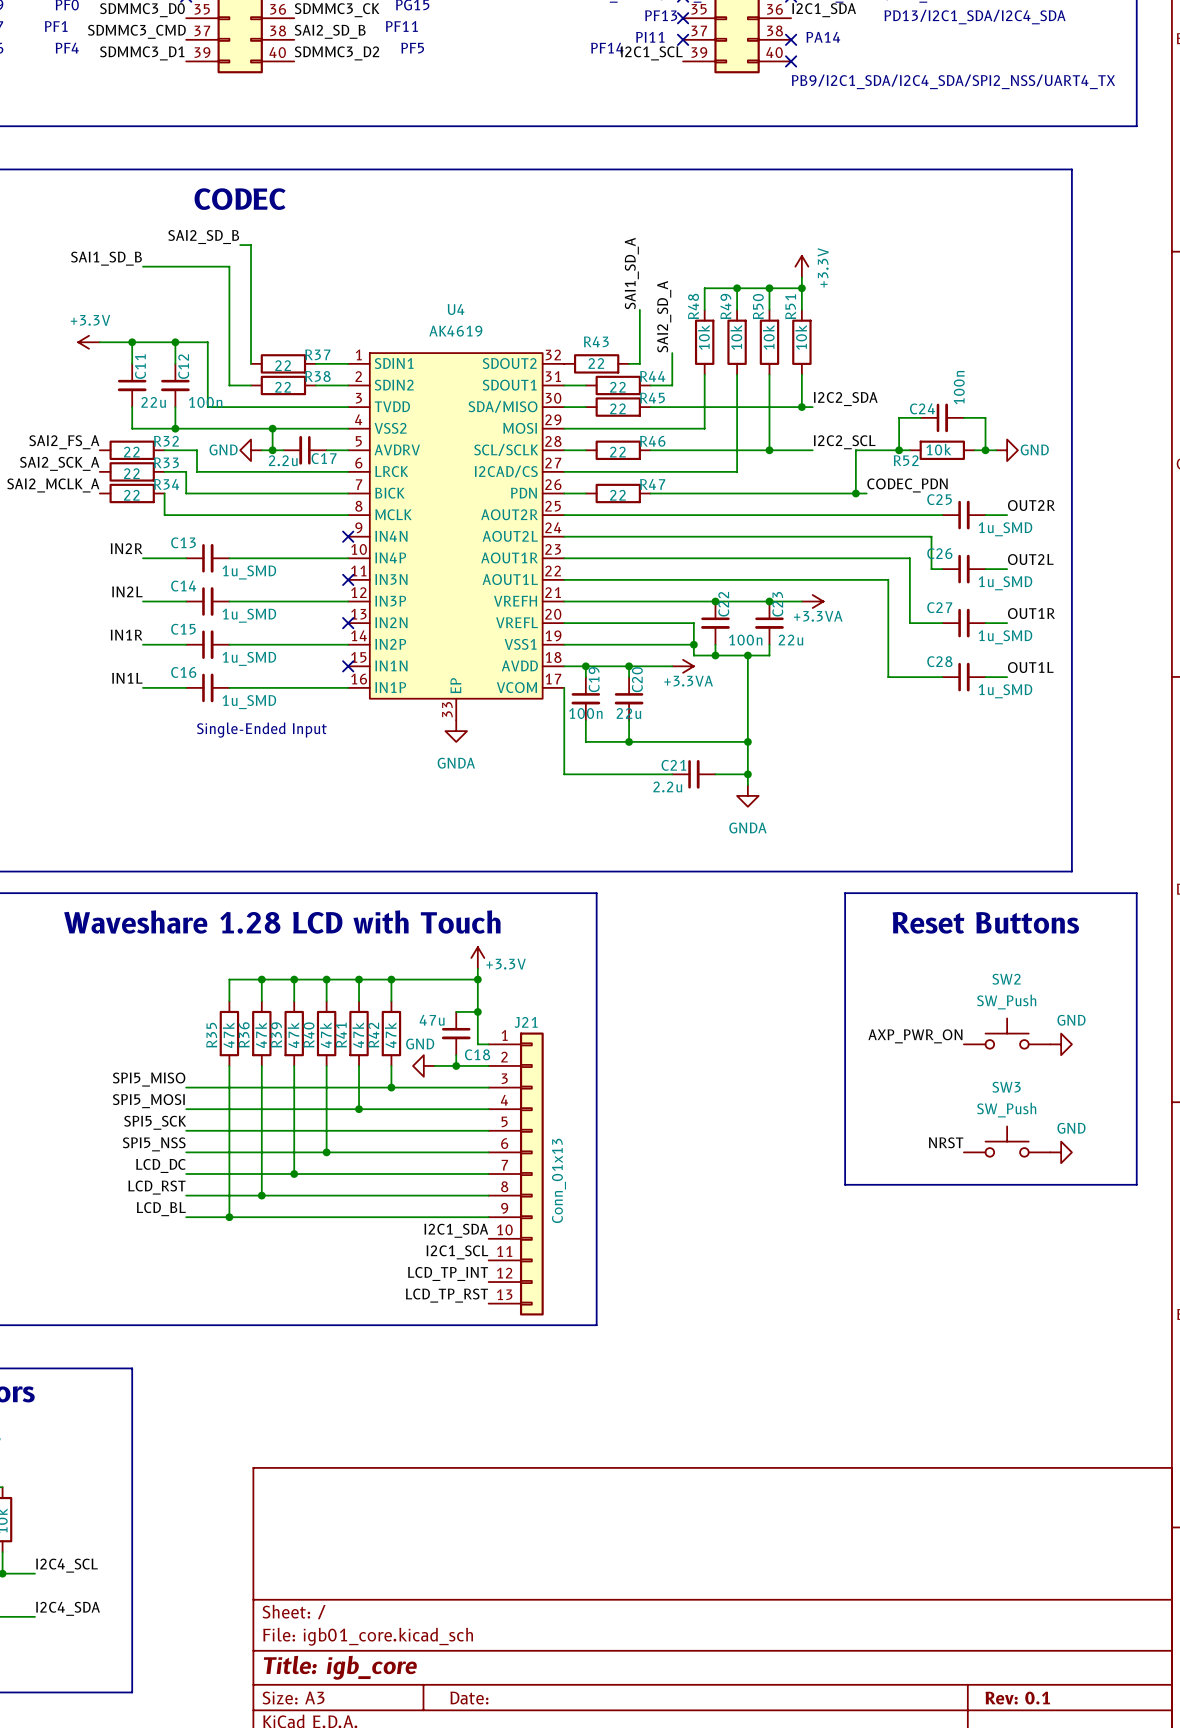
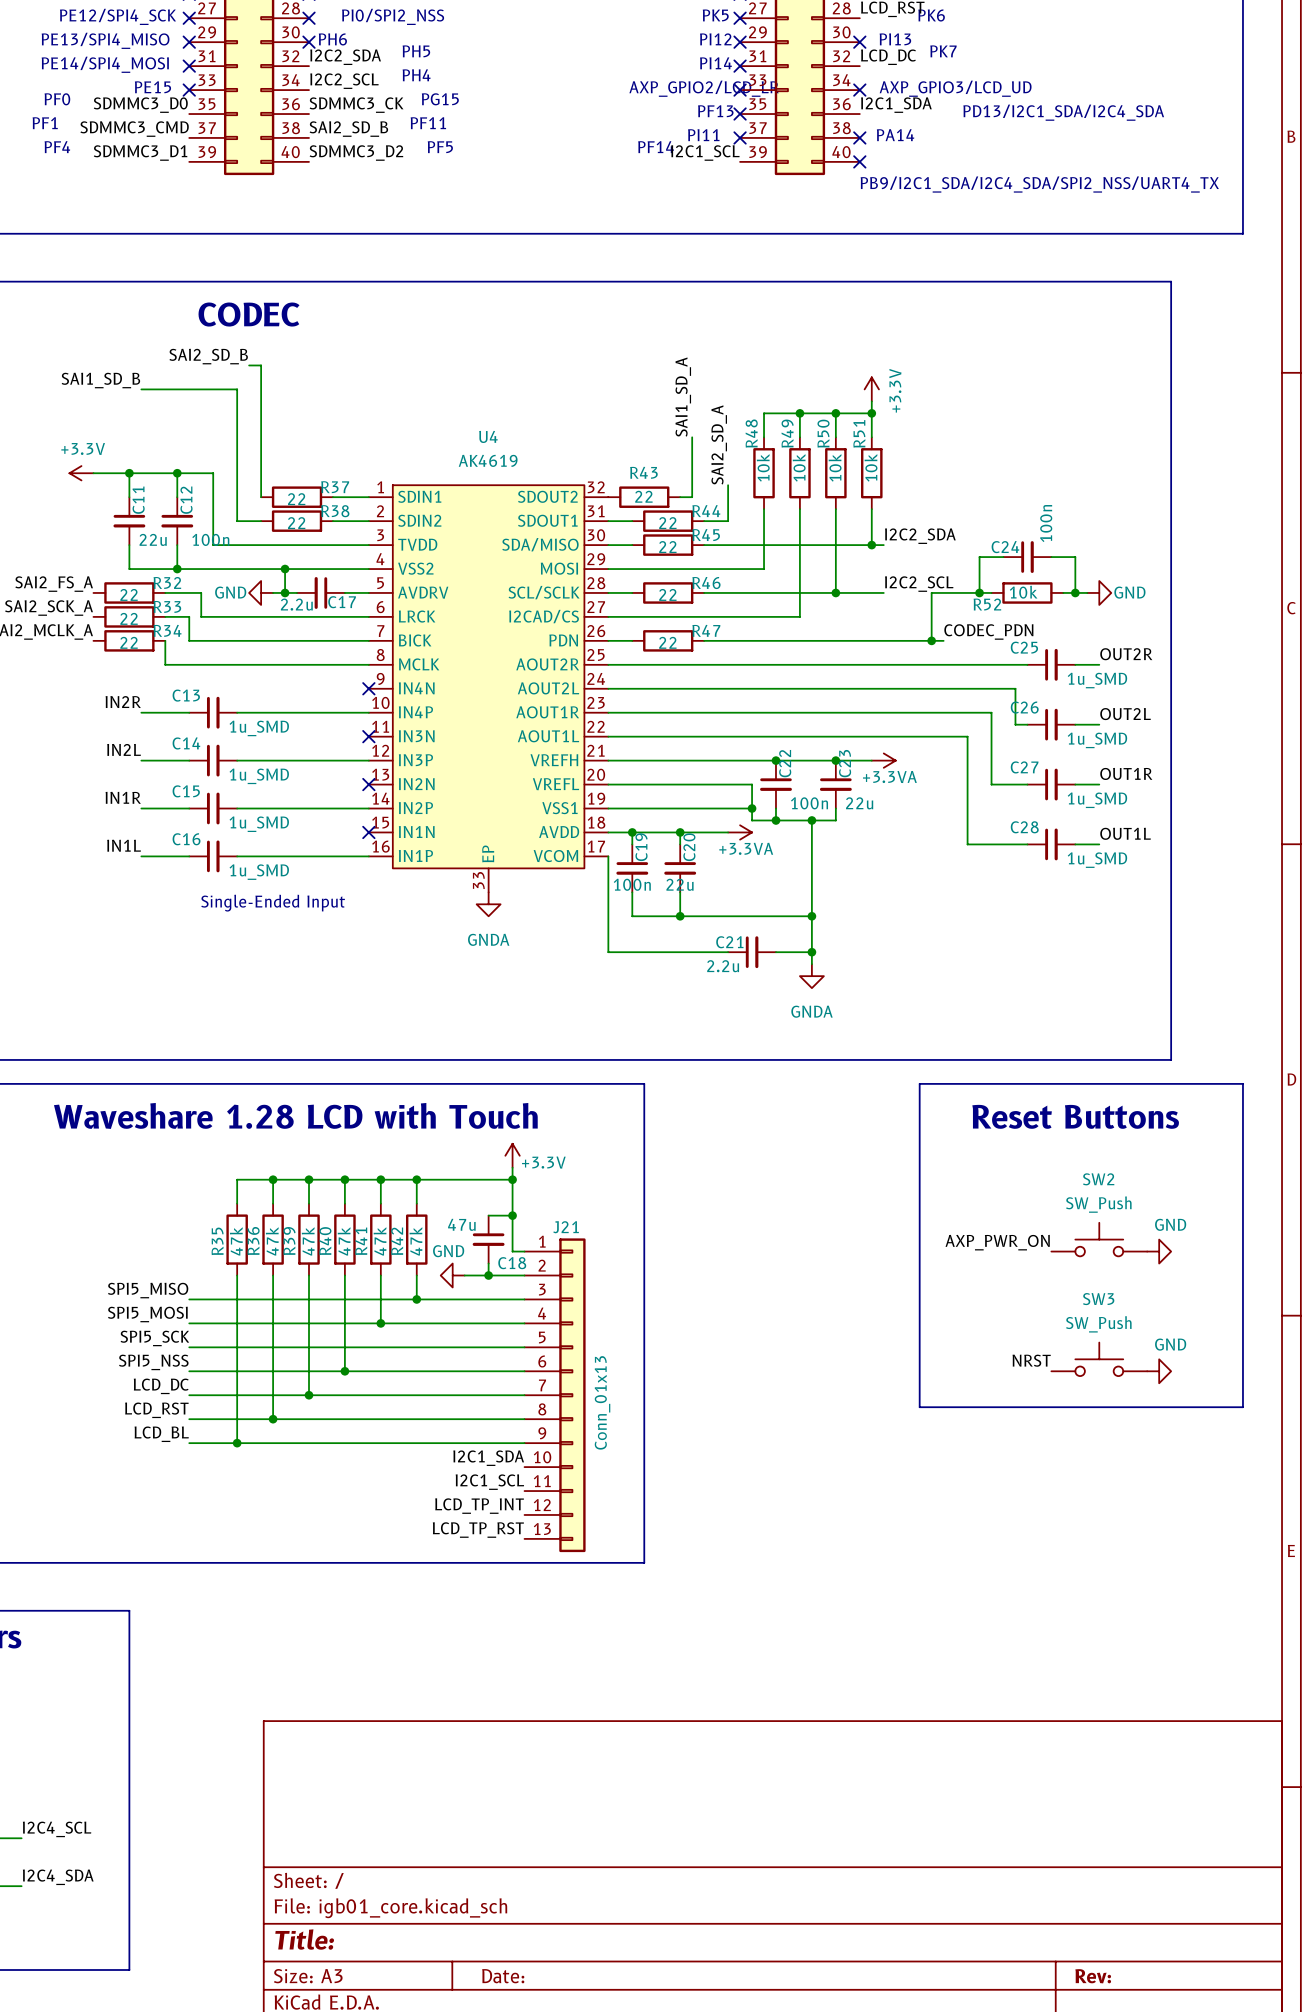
title block: Title: igb_core (340, 1667) -> Title: (304, 1939)
title block: Rev: 0.1 (1017, 1698) -> Rev: (1093, 1976)

